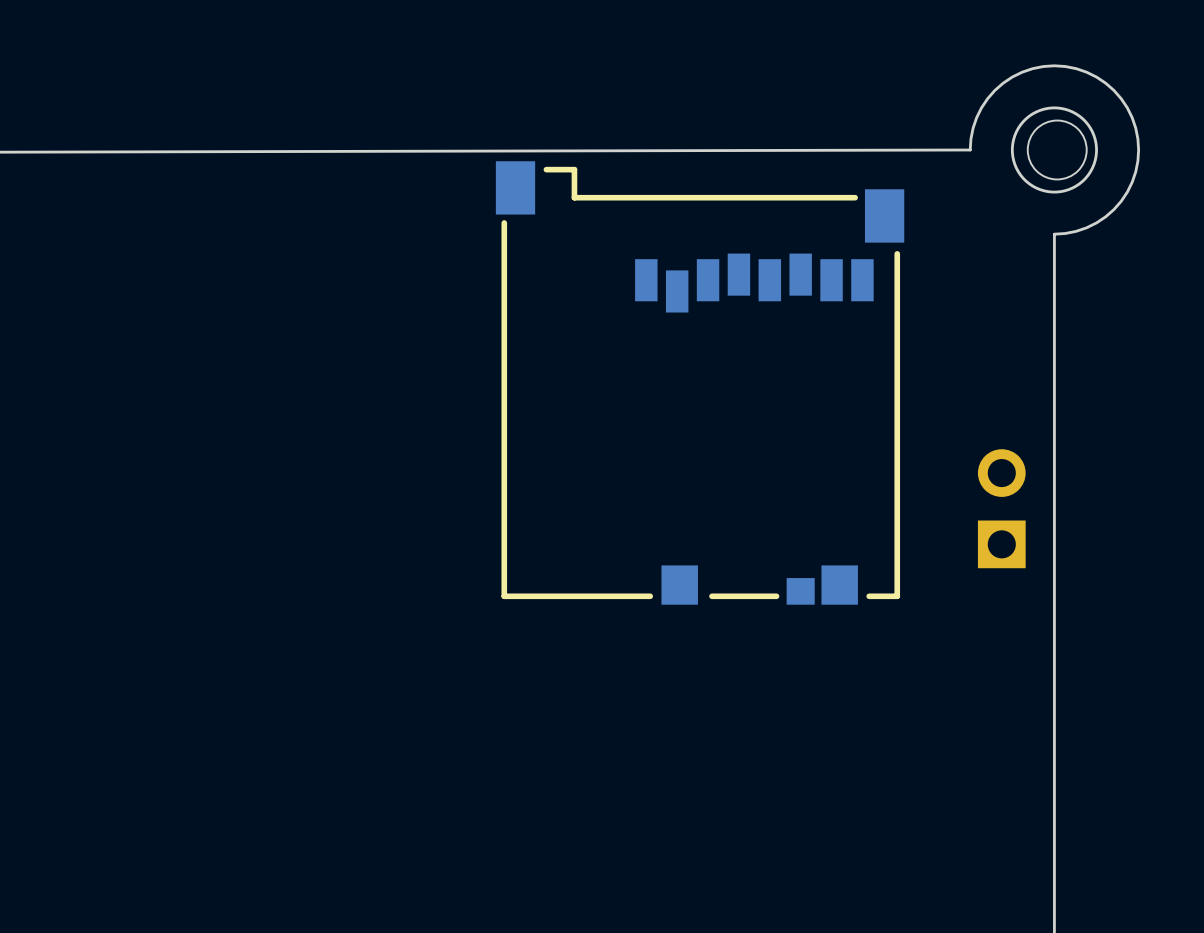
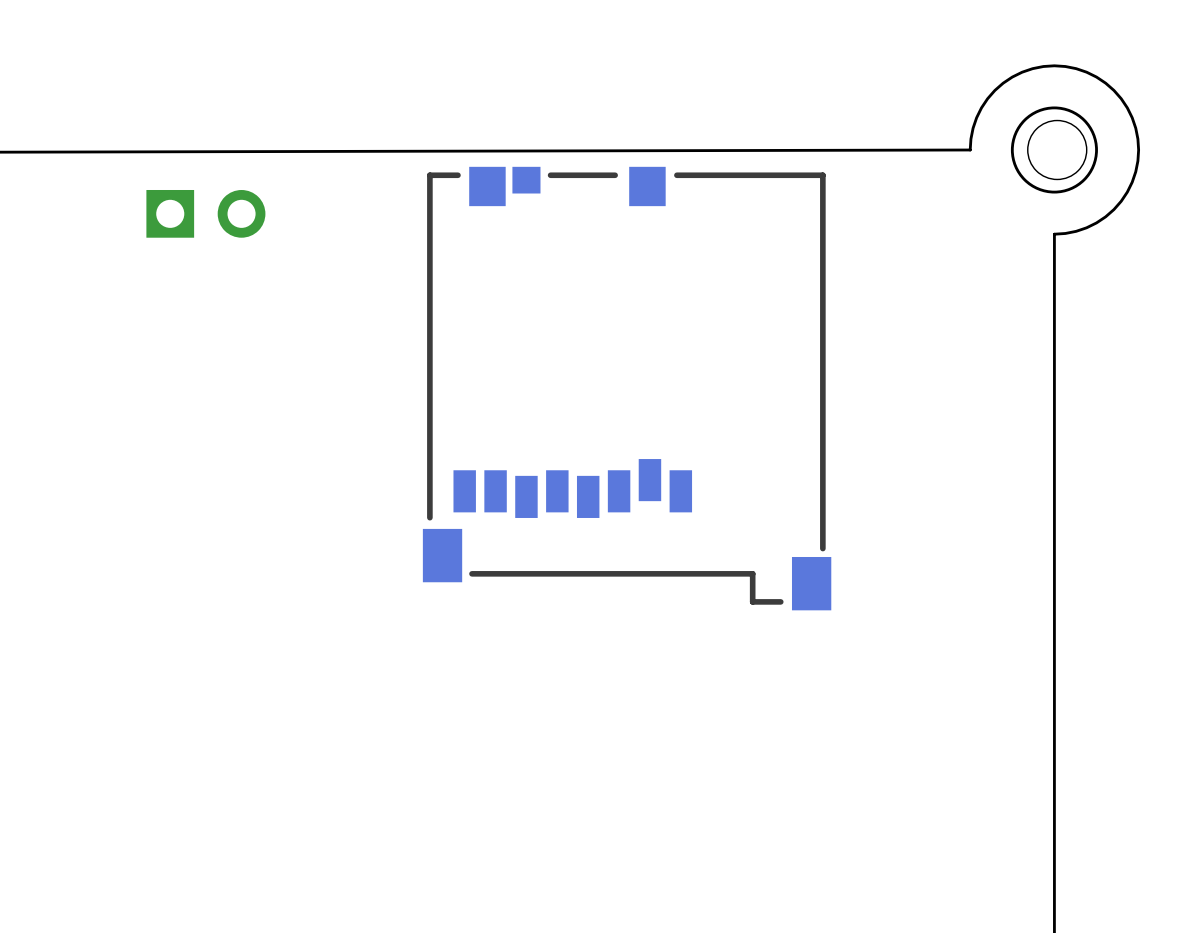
part: none -> (205, 213)
part rotation: 0° (700, 382) -> 180° (627, 388)
part: (1001, 508) -> none

